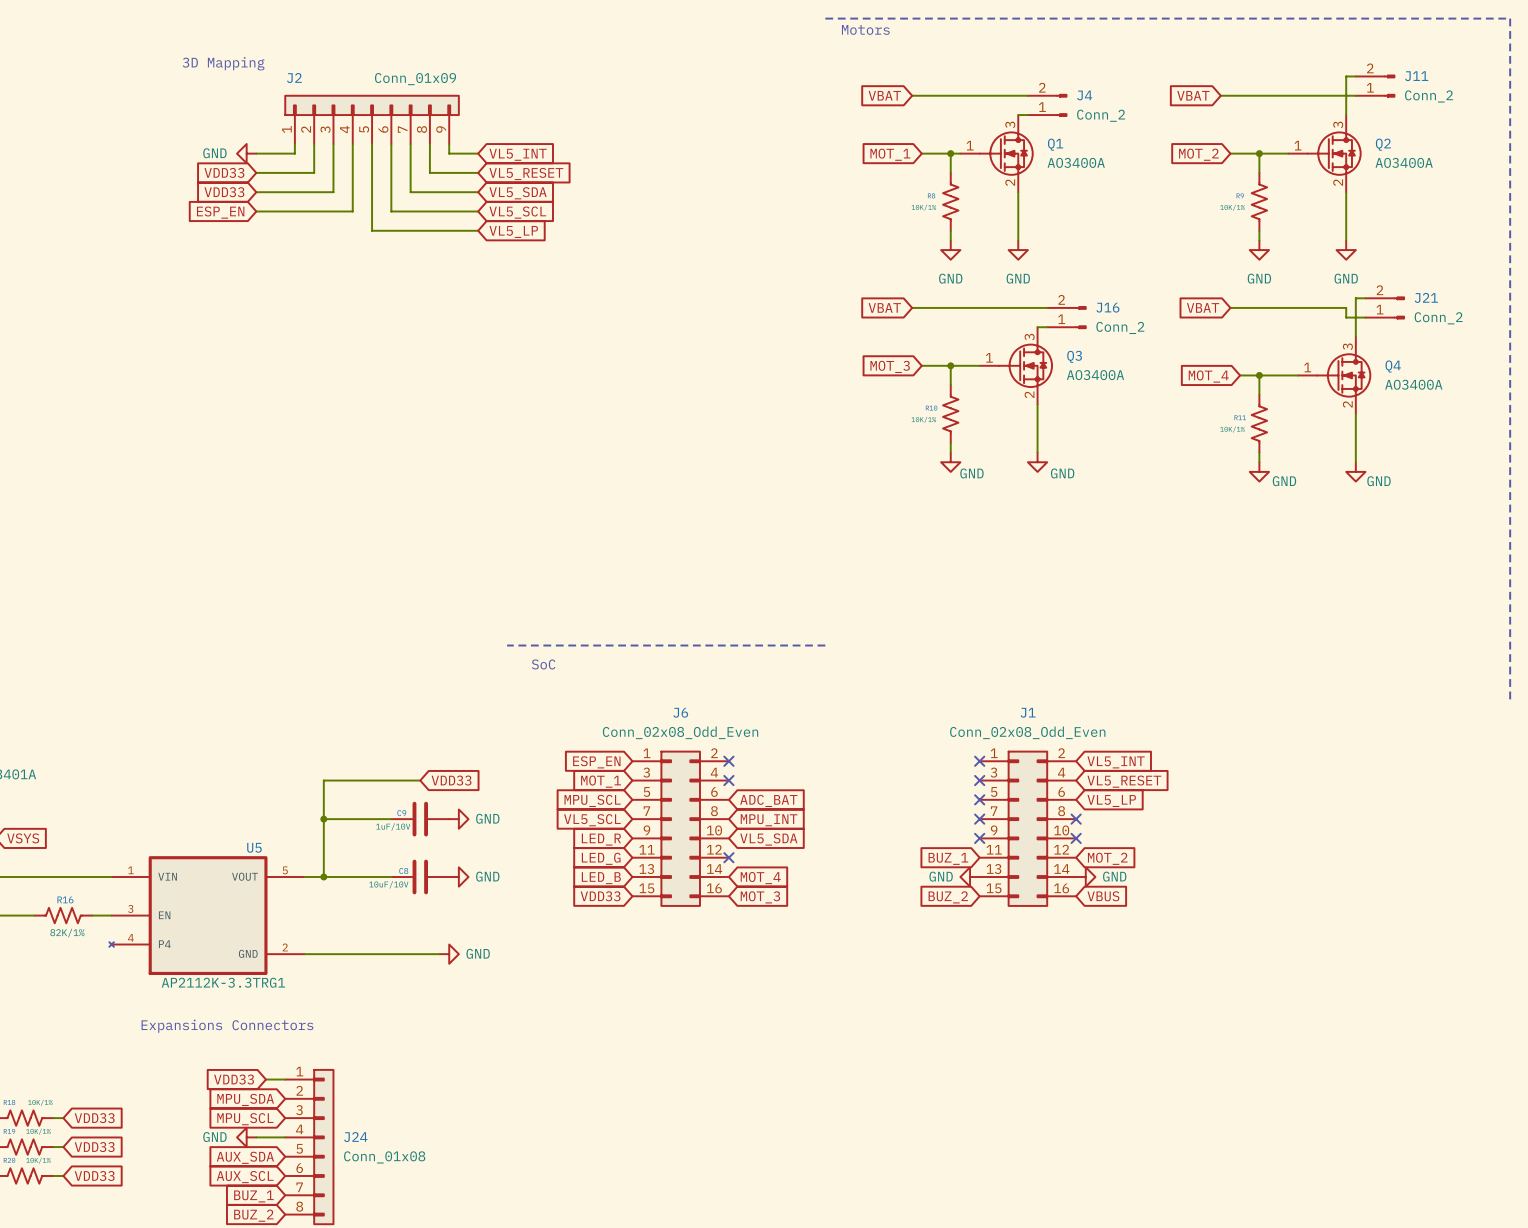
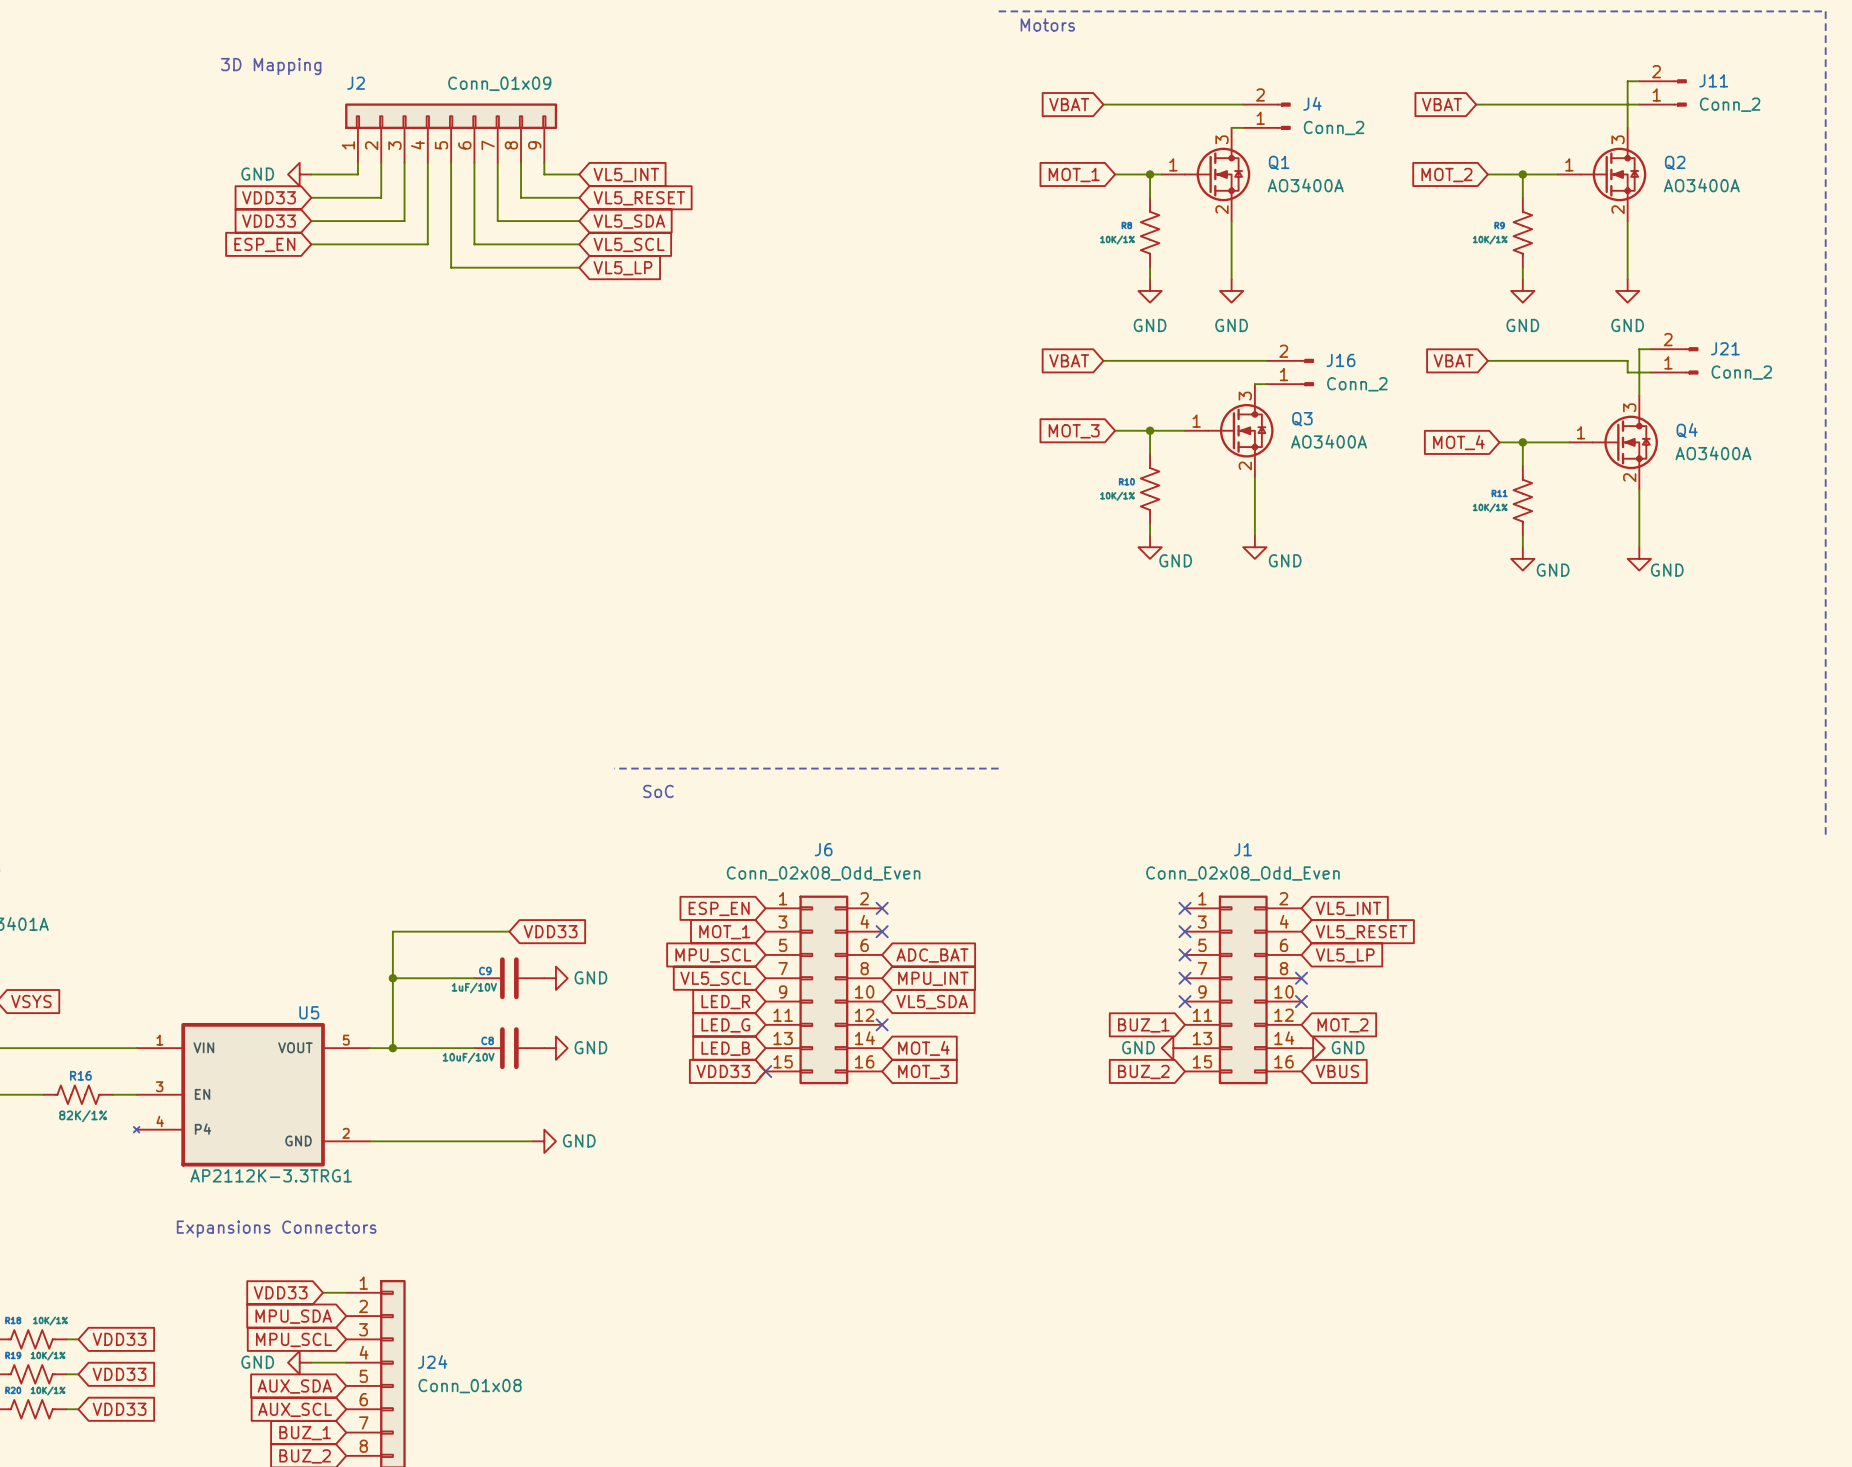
no-connect mark: none -> (765, 1071)

